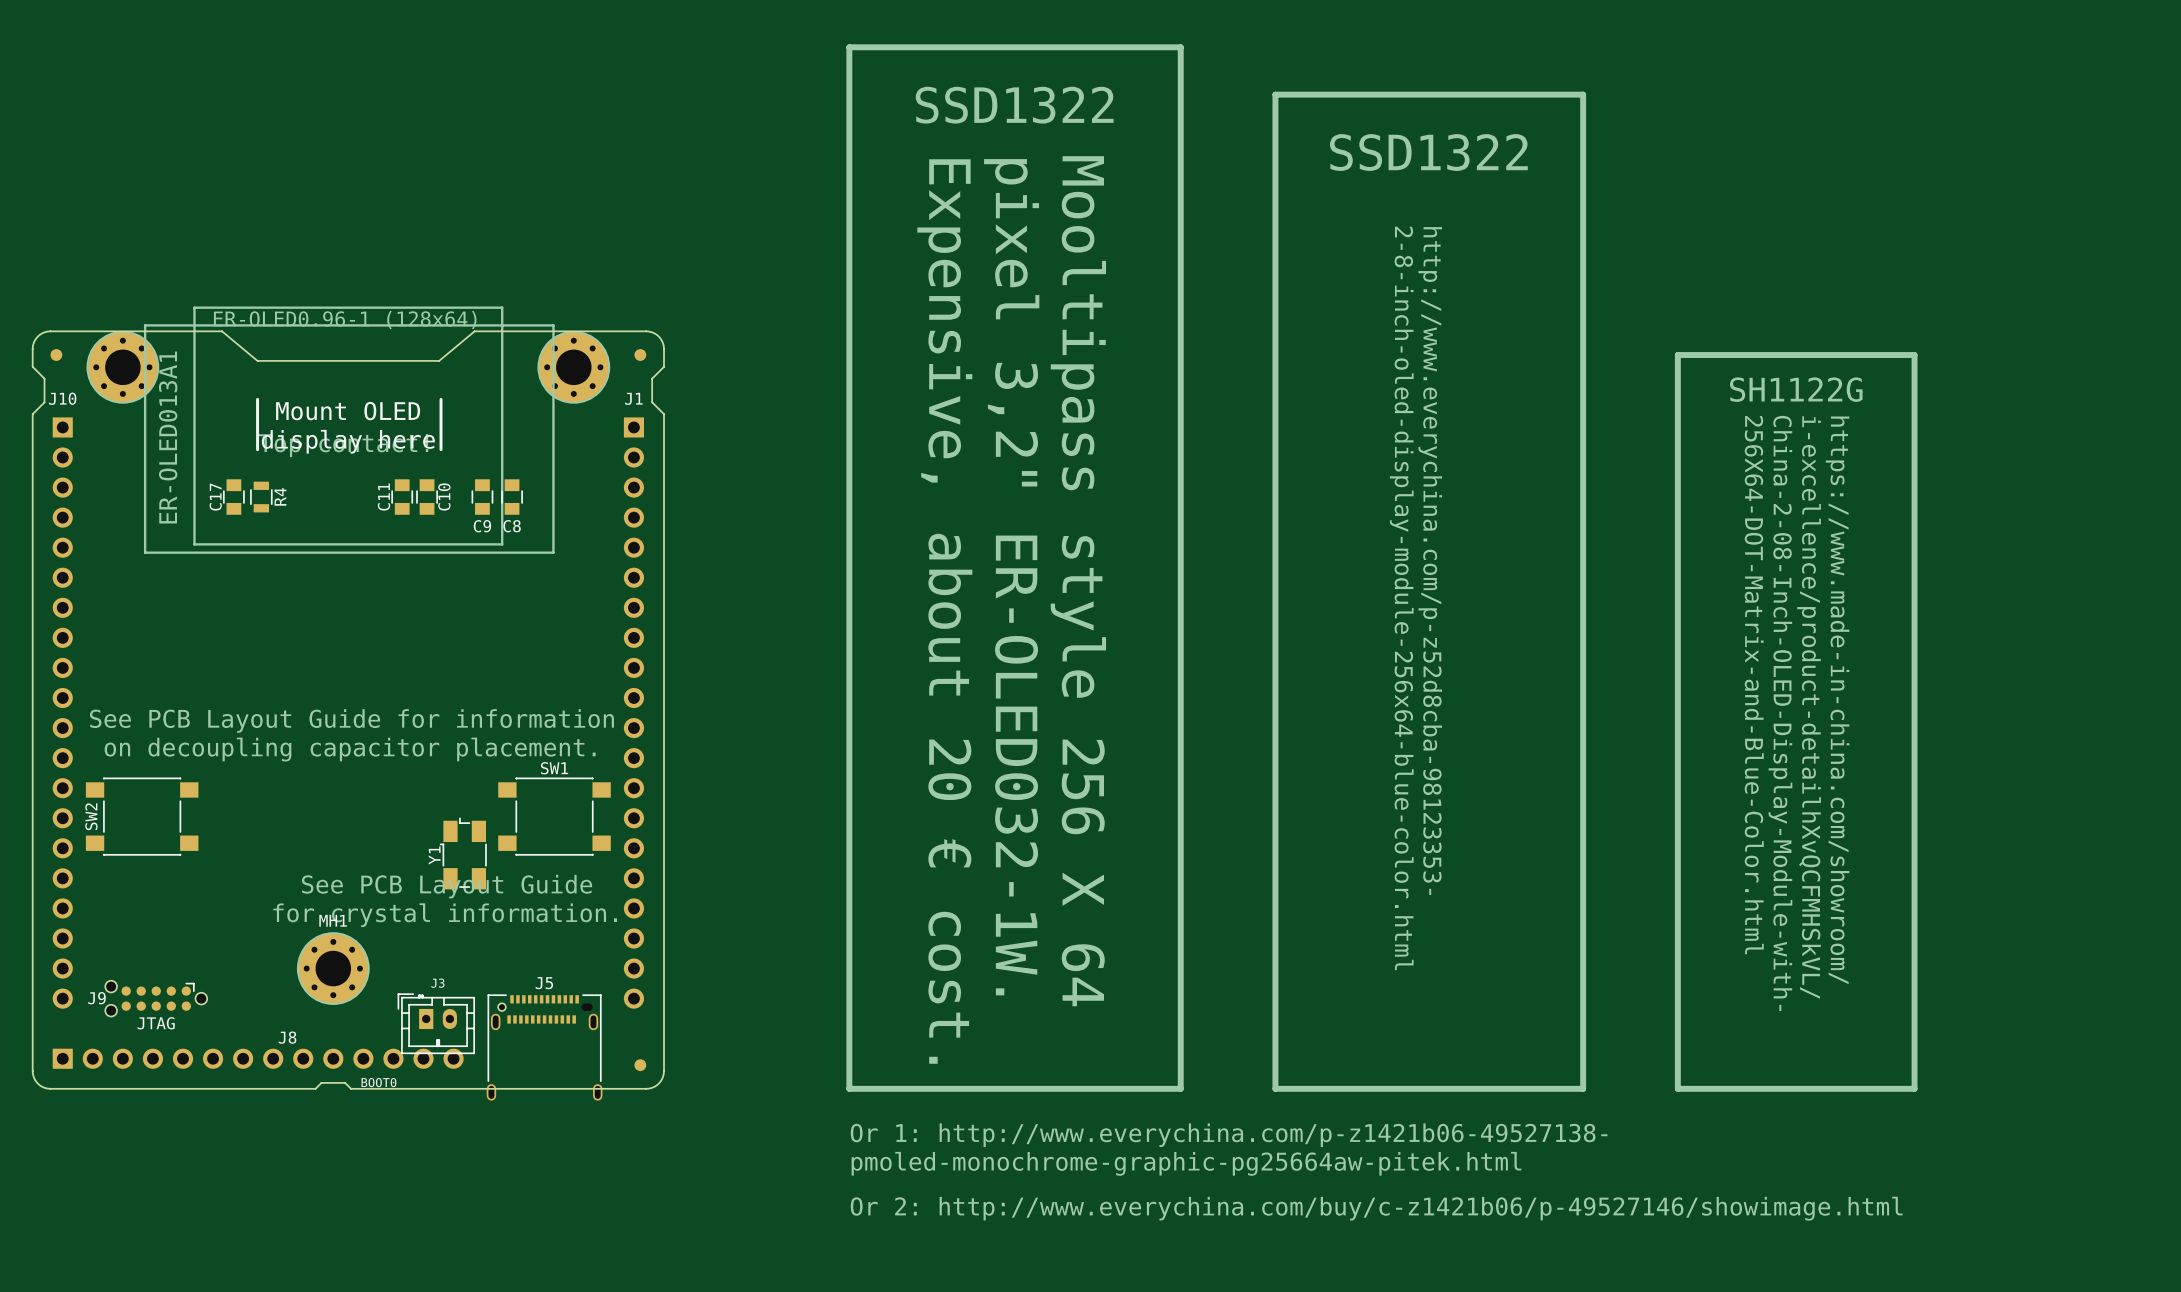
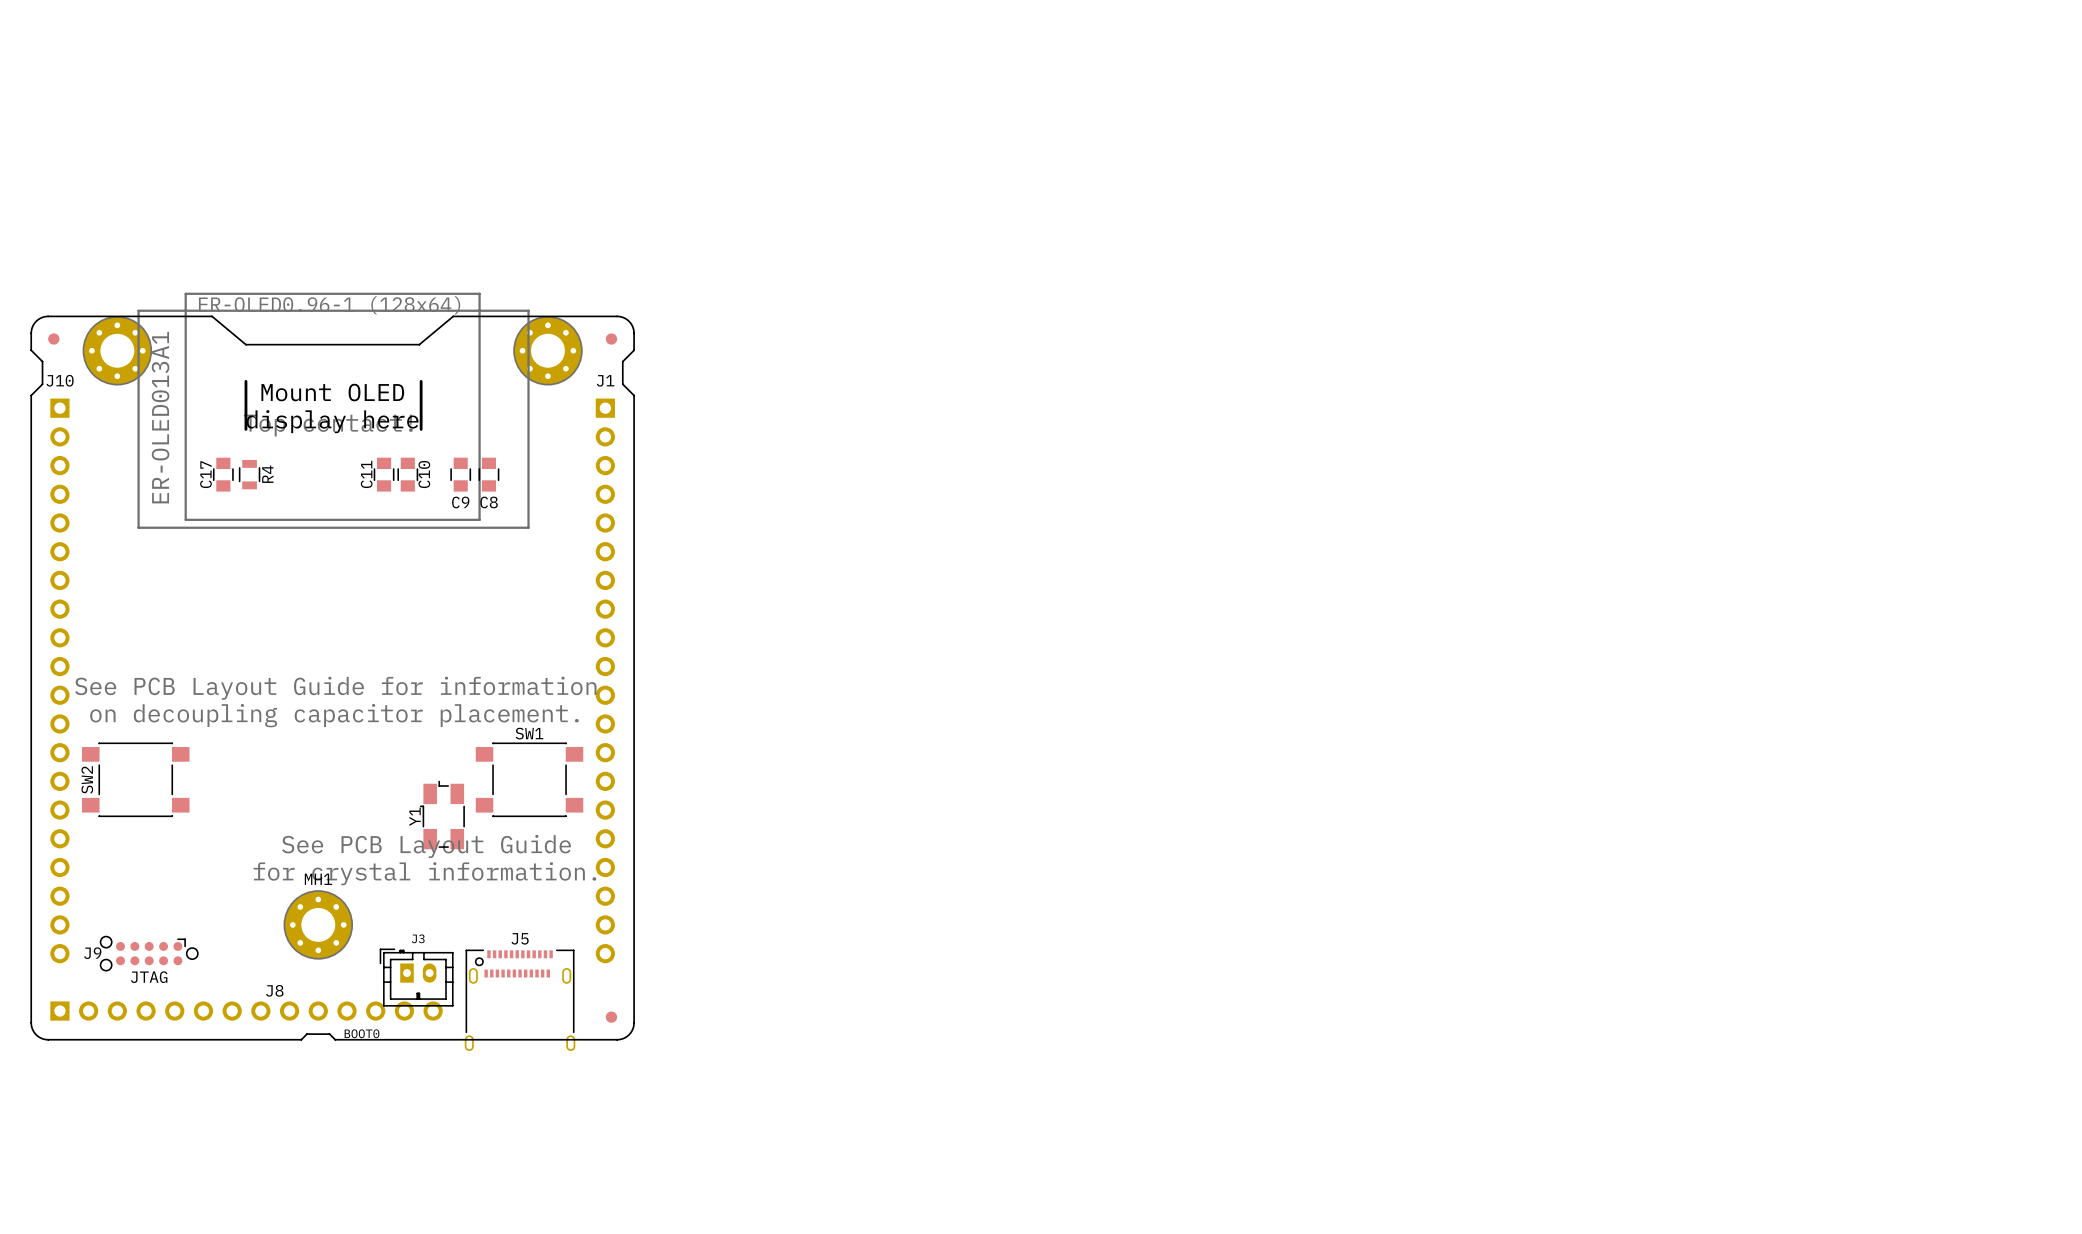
line: (849, 47) (1180, 47) (1180, 1088) (849, 1088) (849, 47) -> none
line: (1275, 94) (1583, 94) (1583, 1088) (1275, 1088) (1275, 94) -> none
text: SSD1322 (1014, 105) -> none
text: SSD1322 (1428, 152) -> none
line: (1677, 355) (1914, 355) (1914, 1088) (1677, 1088) (1677, 355) -> none
text: SH1122G (1796, 389) -> none
text: http://www.everychina.com/p-z52d8cba-98123353- (1430, 561) -> none
text: pixel 3,2" ER-OLED032-1W. (1011, 577) -> none
text: Mooltipass style 256 X 64 (1078, 581) -> none
text: 2-8-inch-oled-display-module-256x64-blue-color.html (1401, 598) -> none
text: Expensive, about 20 € cost. (944, 611) -> none
text: 256X64-DOT-Matrix-and-Blue-Color.html (1754, 685) -> none
text: https://www.made-in-china.com/showroom/ (1837, 700) -> none
text: i-excellence/product-detailhXvQCFMHSkVL/ (1809, 707) -> none
text: China-2-08-Inch-OLED-Display-Module-with- (1780, 713) -> none
text: Or 1: http://www.everychina.com/p-z1421b06-49527138- (1229, 1135) -> none
text: pmoled-monochrome-graphic-pg25664aw-pitek.html (1186, 1163) -> none
text: Or 2: http://www.everychina.com/buy/c-z1421b06/p-49527146/showimage.html (1376, 1208) -> none

